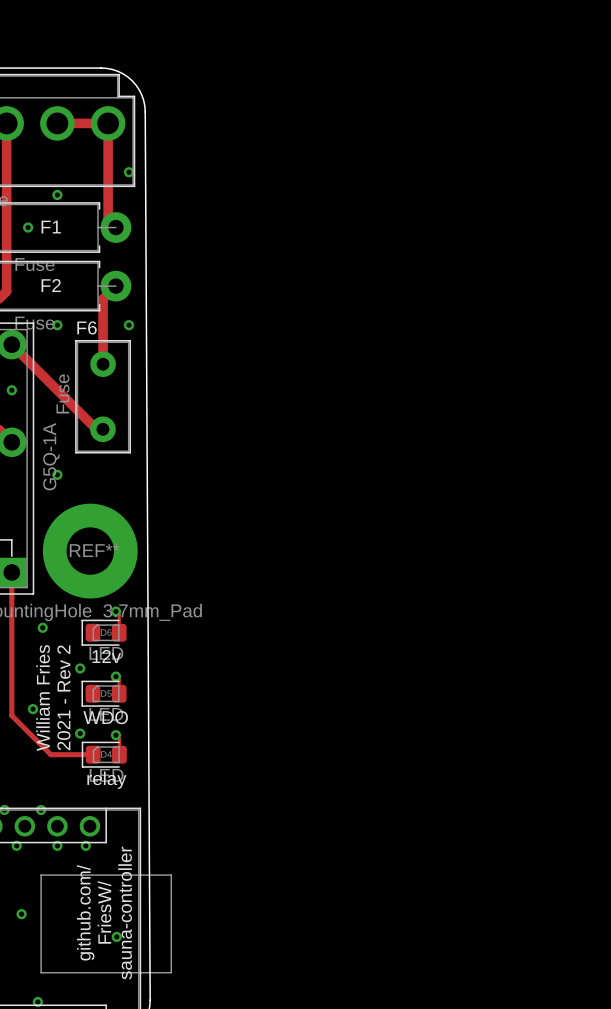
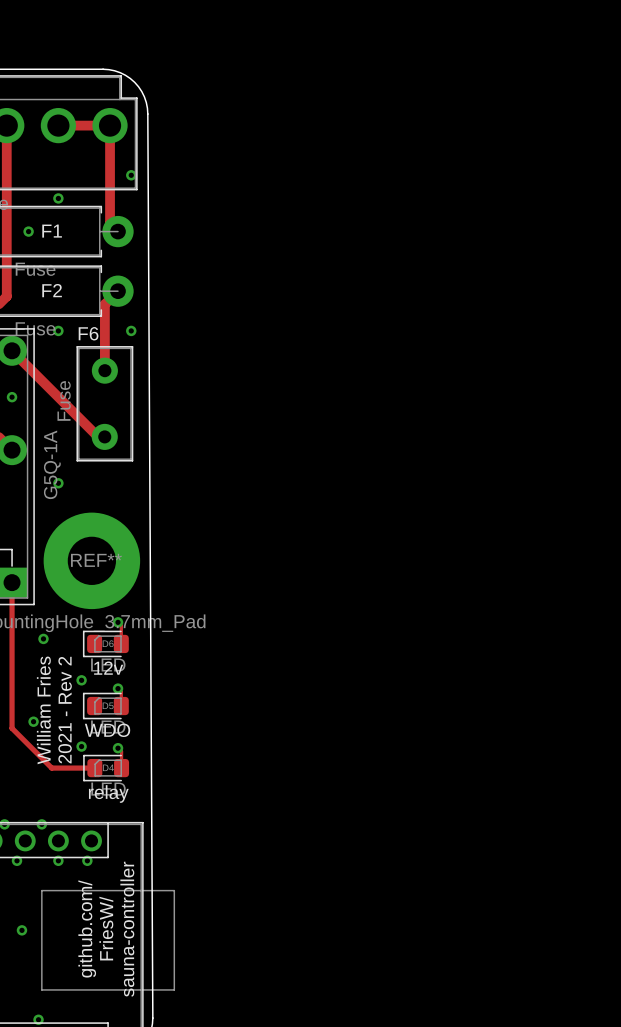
via: (116, 936) -> none

